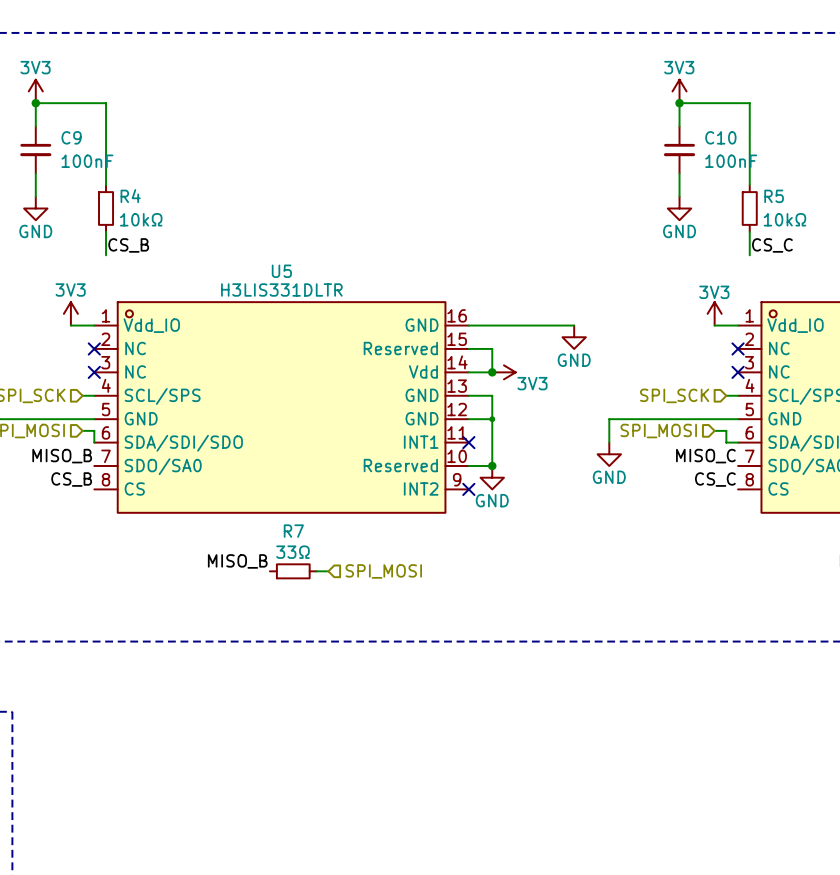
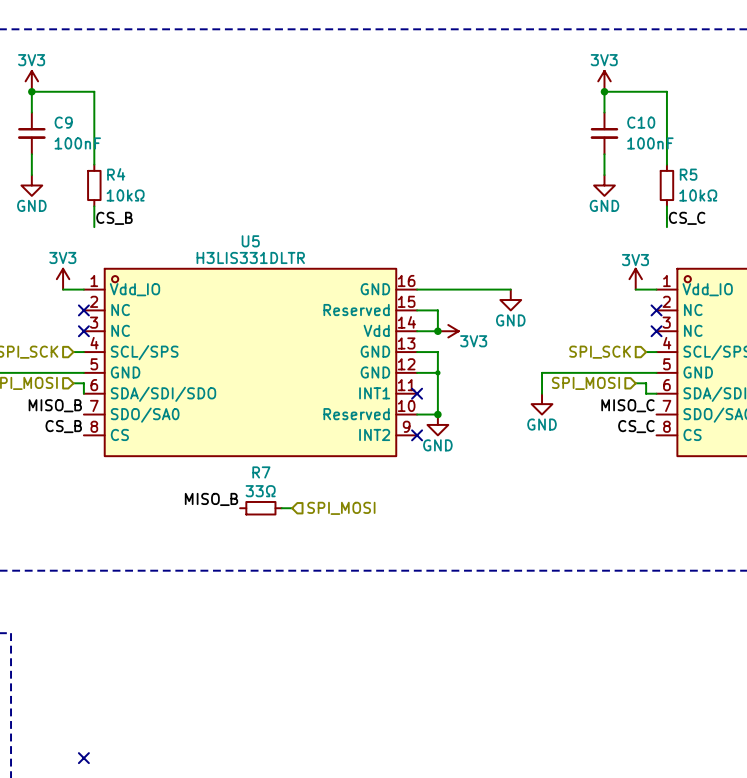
no-connect mark: none -> (83, 758)

